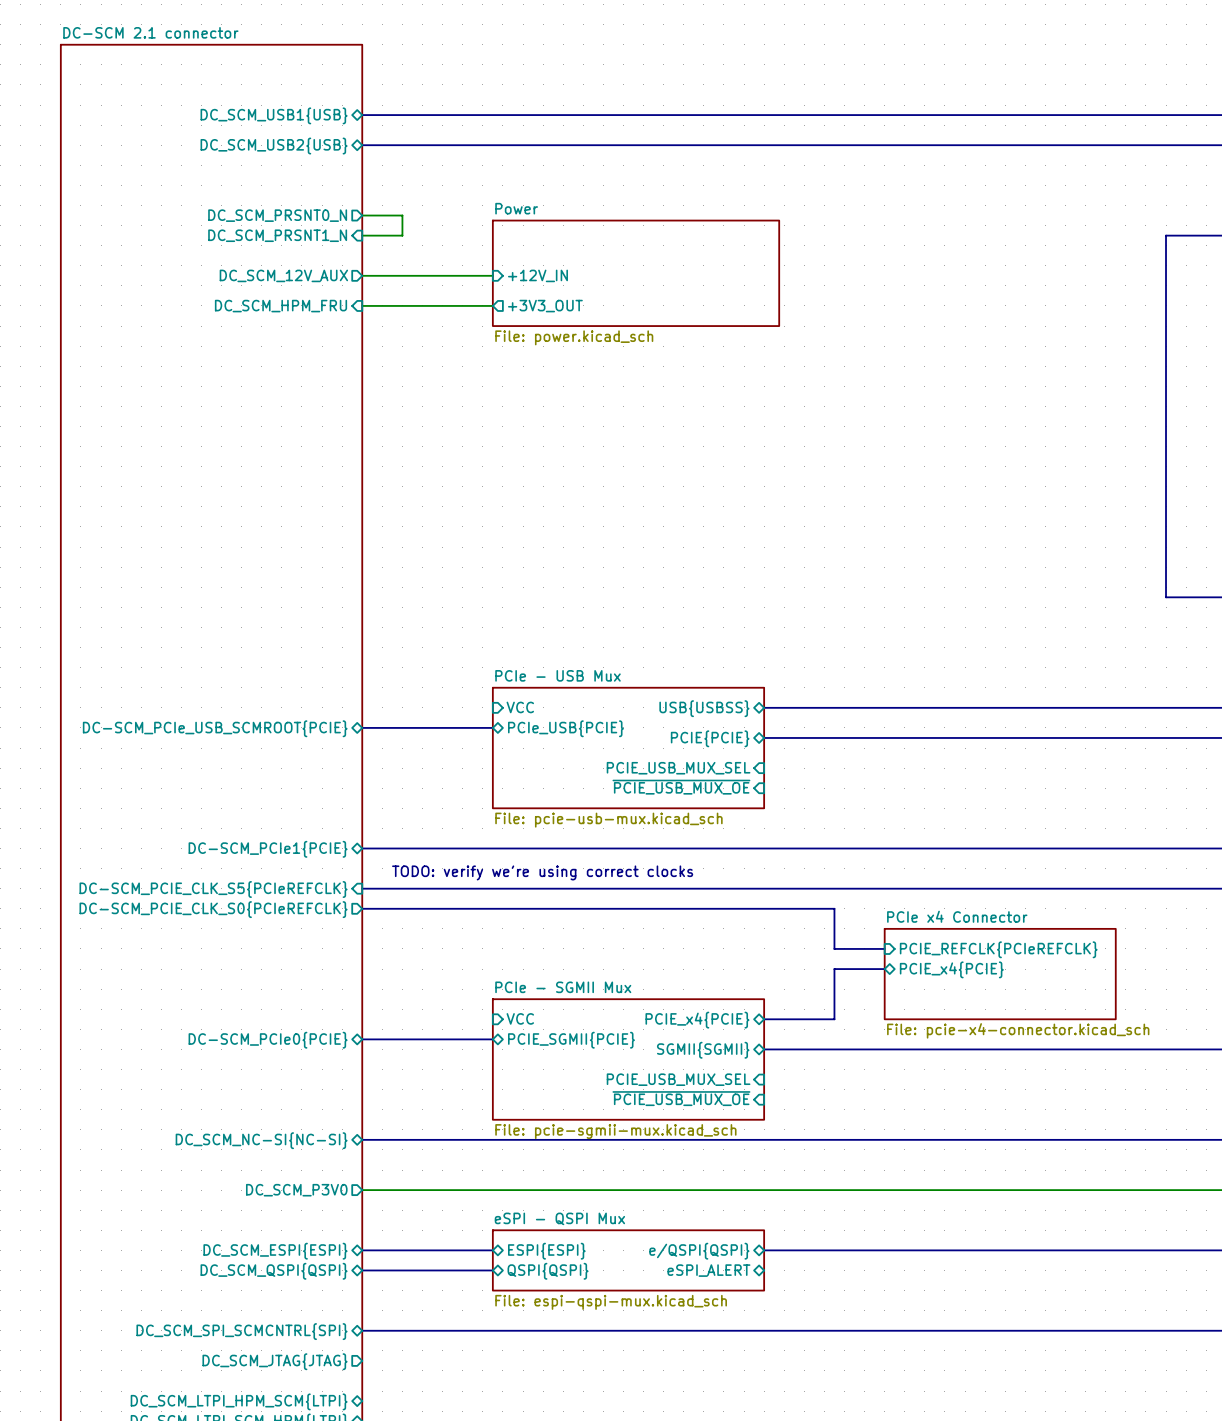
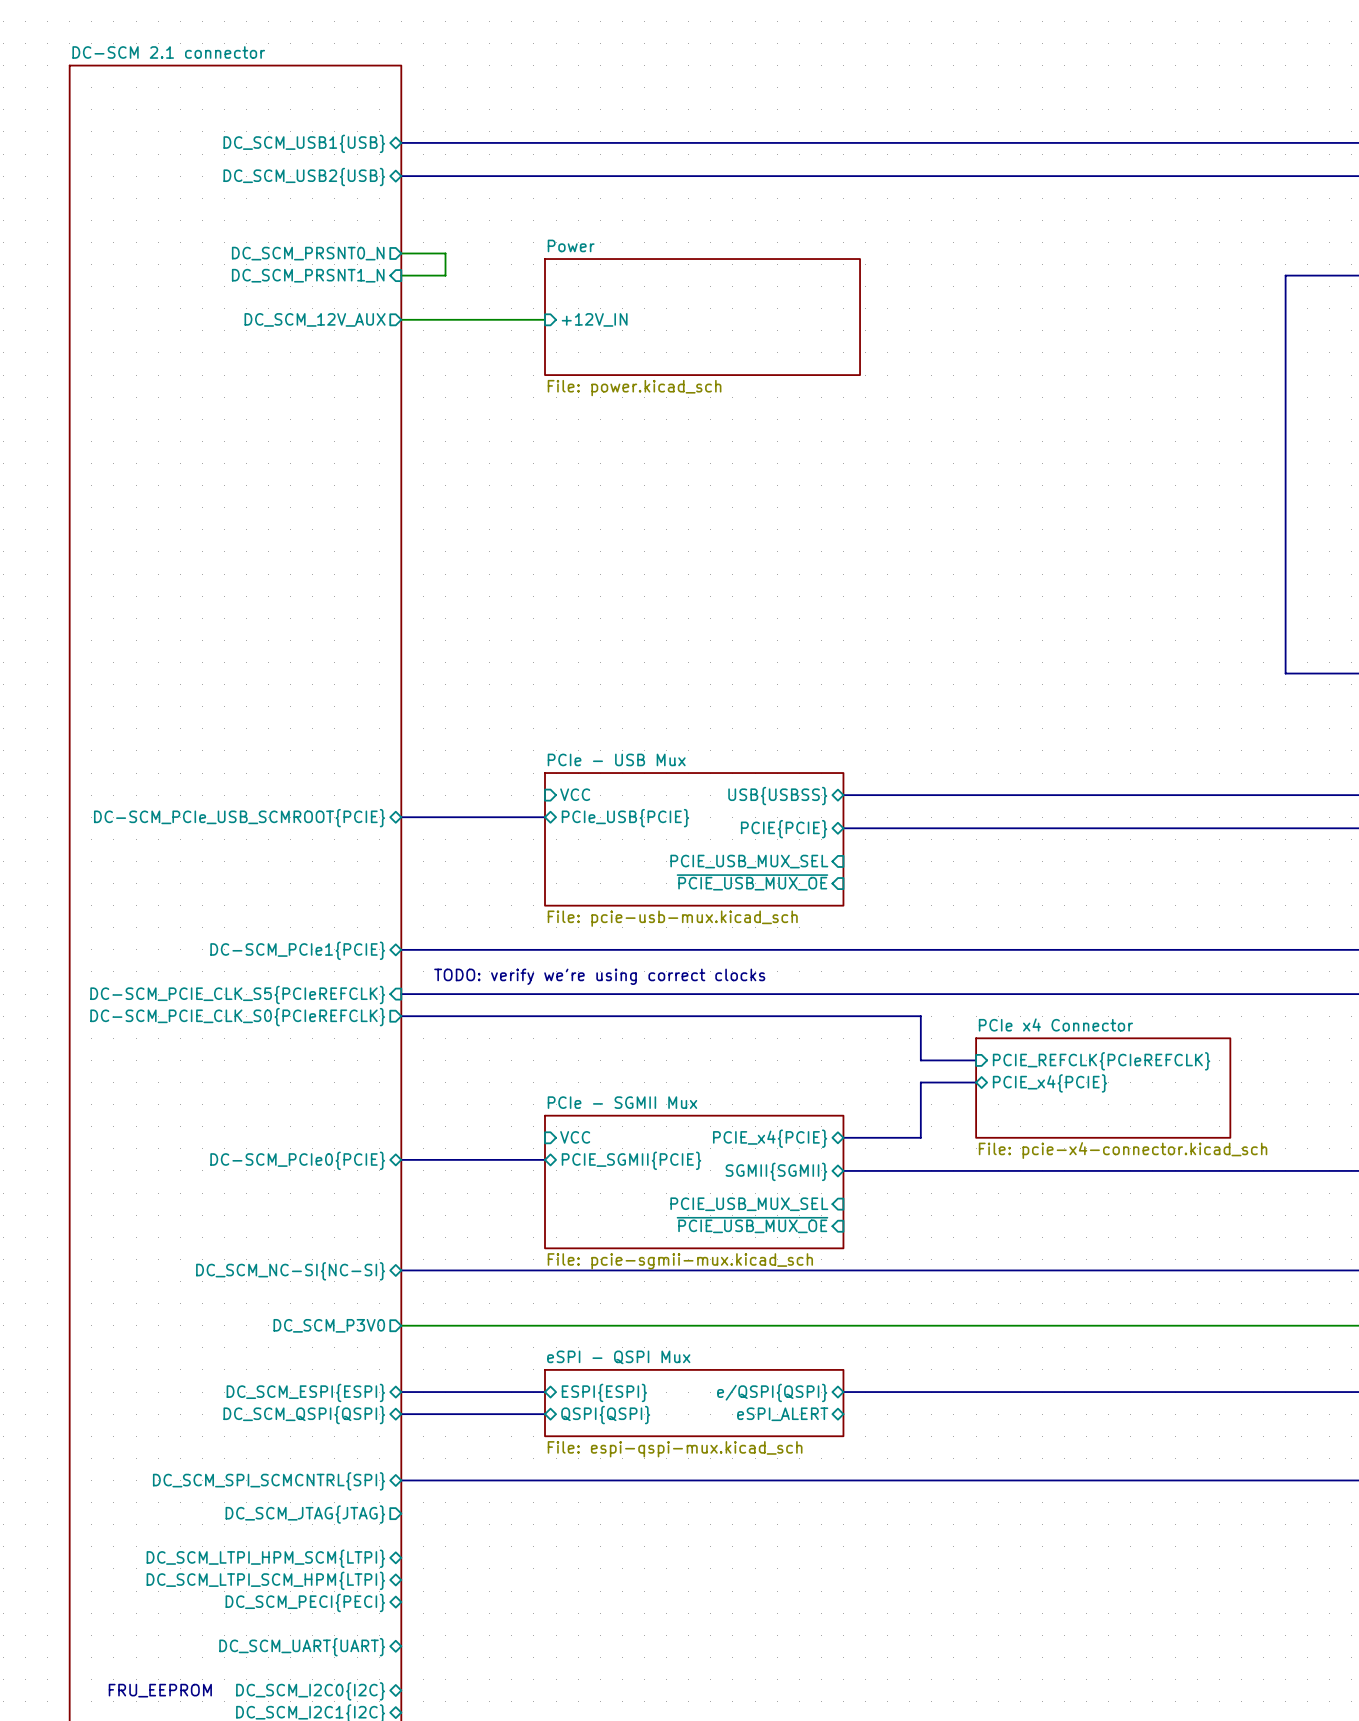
wire: (362, 305) (492, 305) -> none
sheet pin: DC_SCM_HPM_FRU (280, 306) -> none
sheet pin: +3V3_OUT (545, 306) -> none

